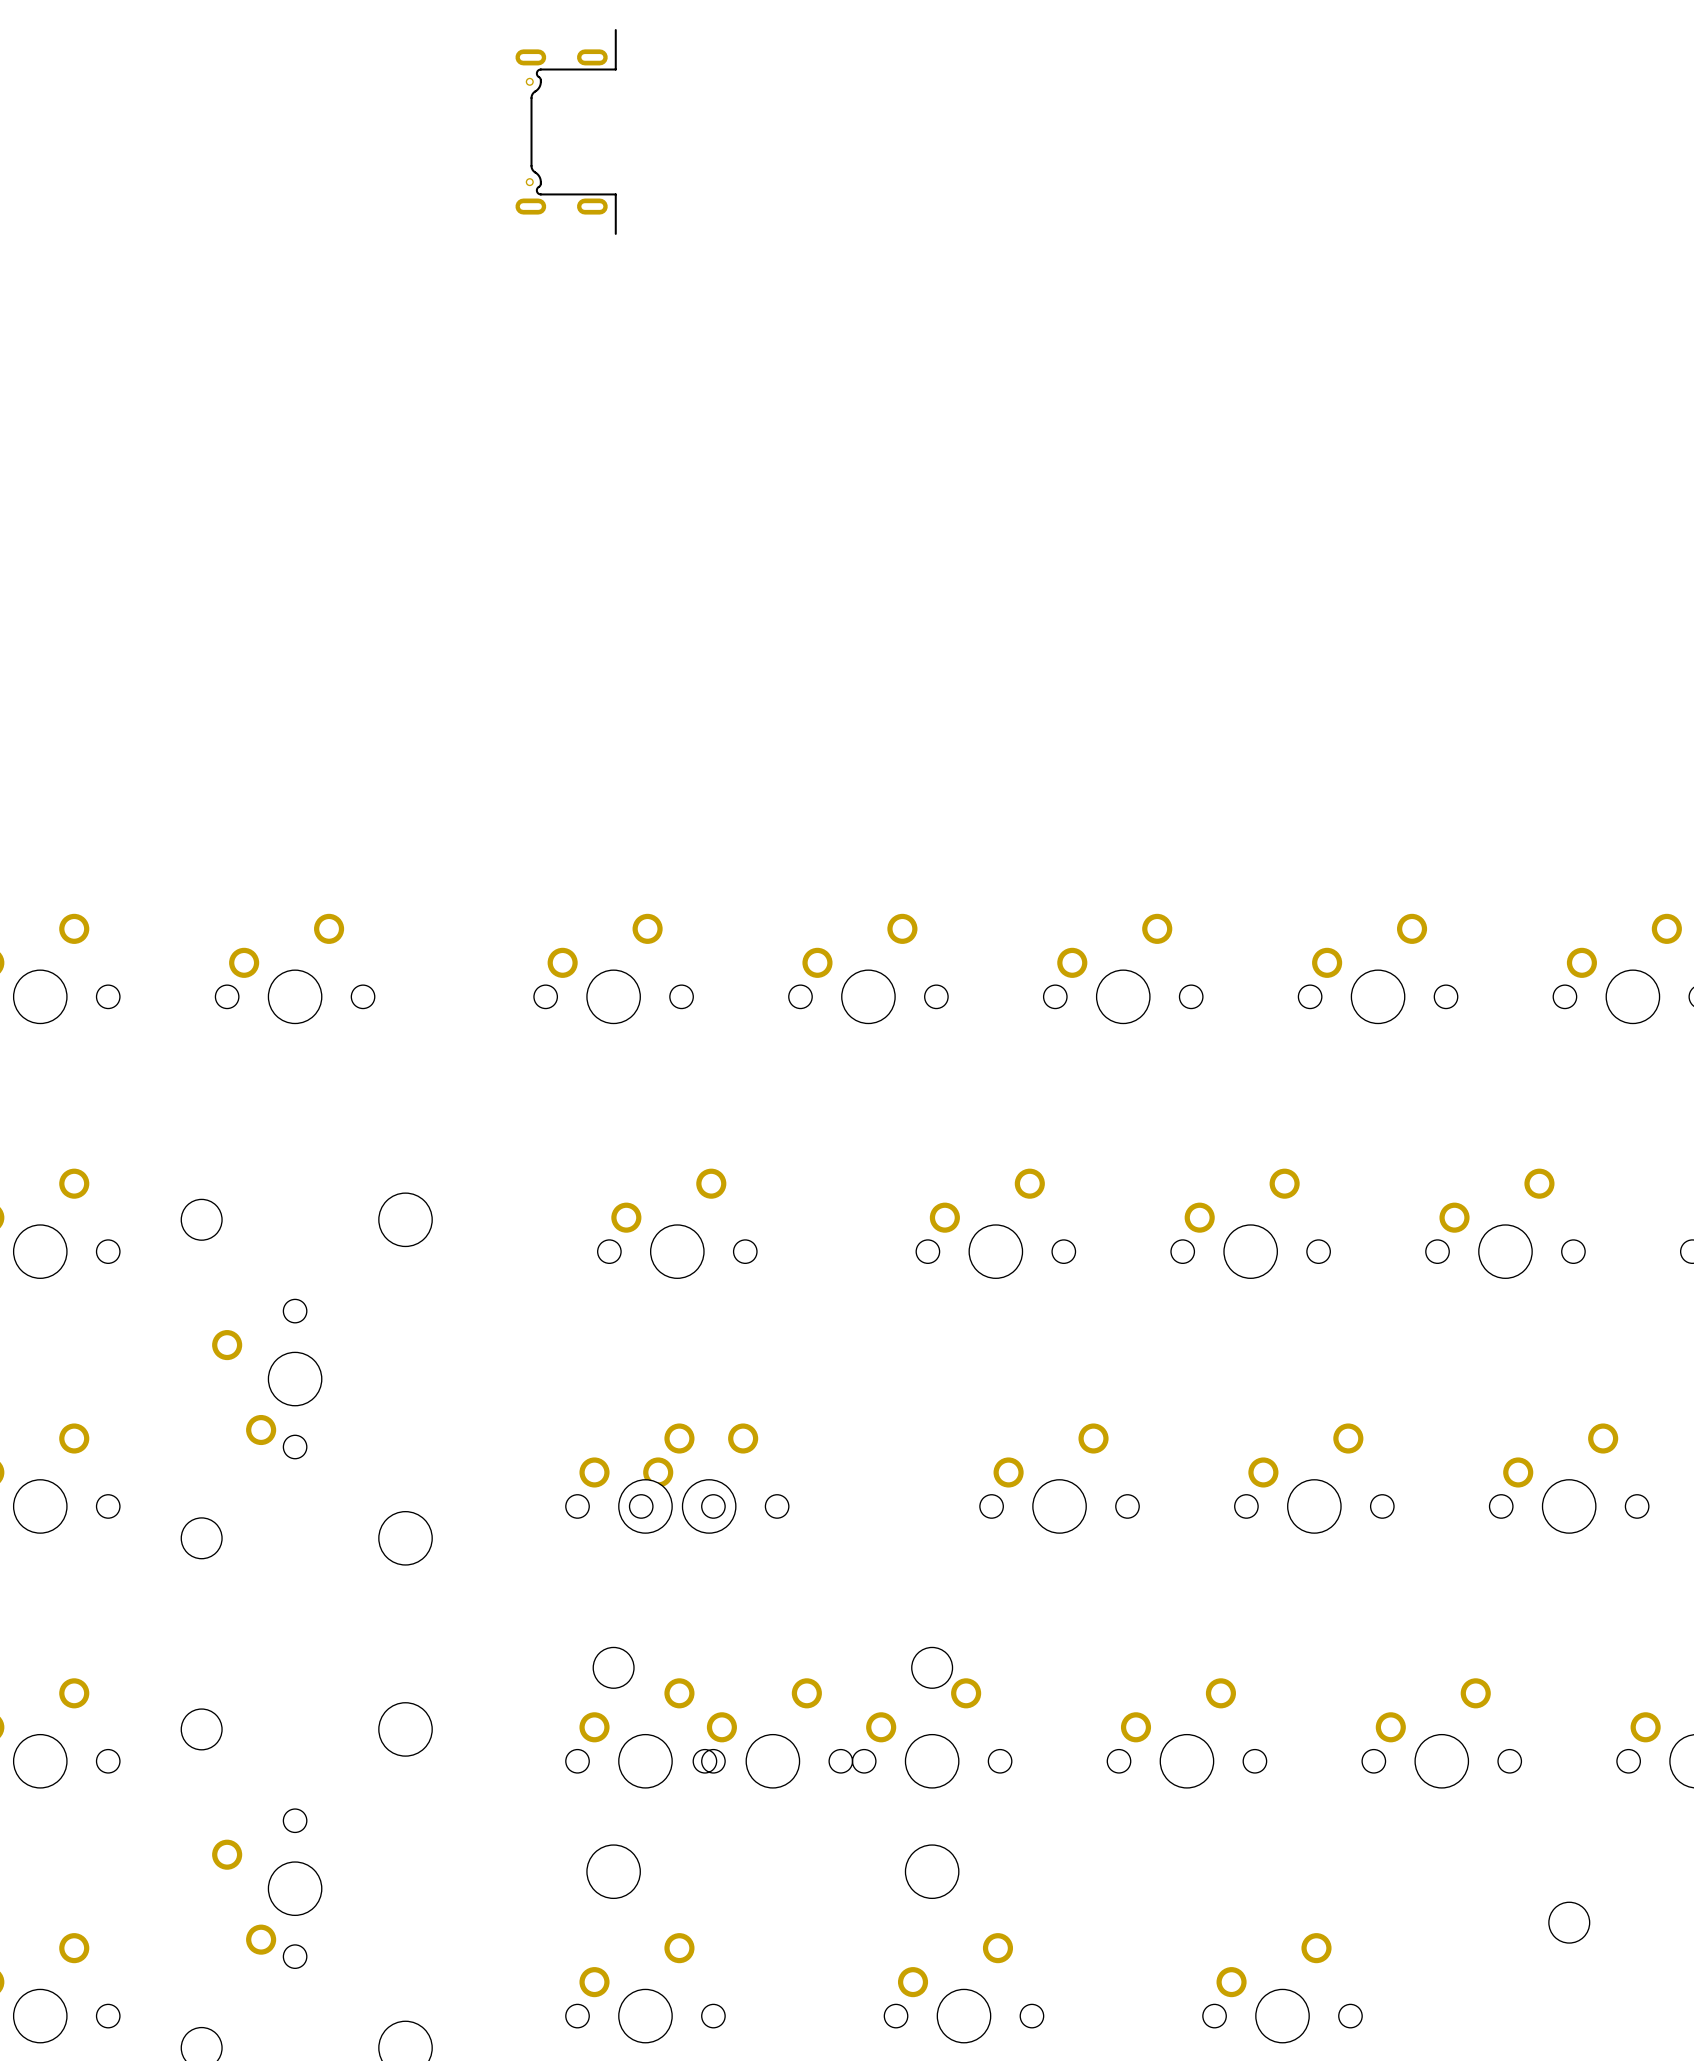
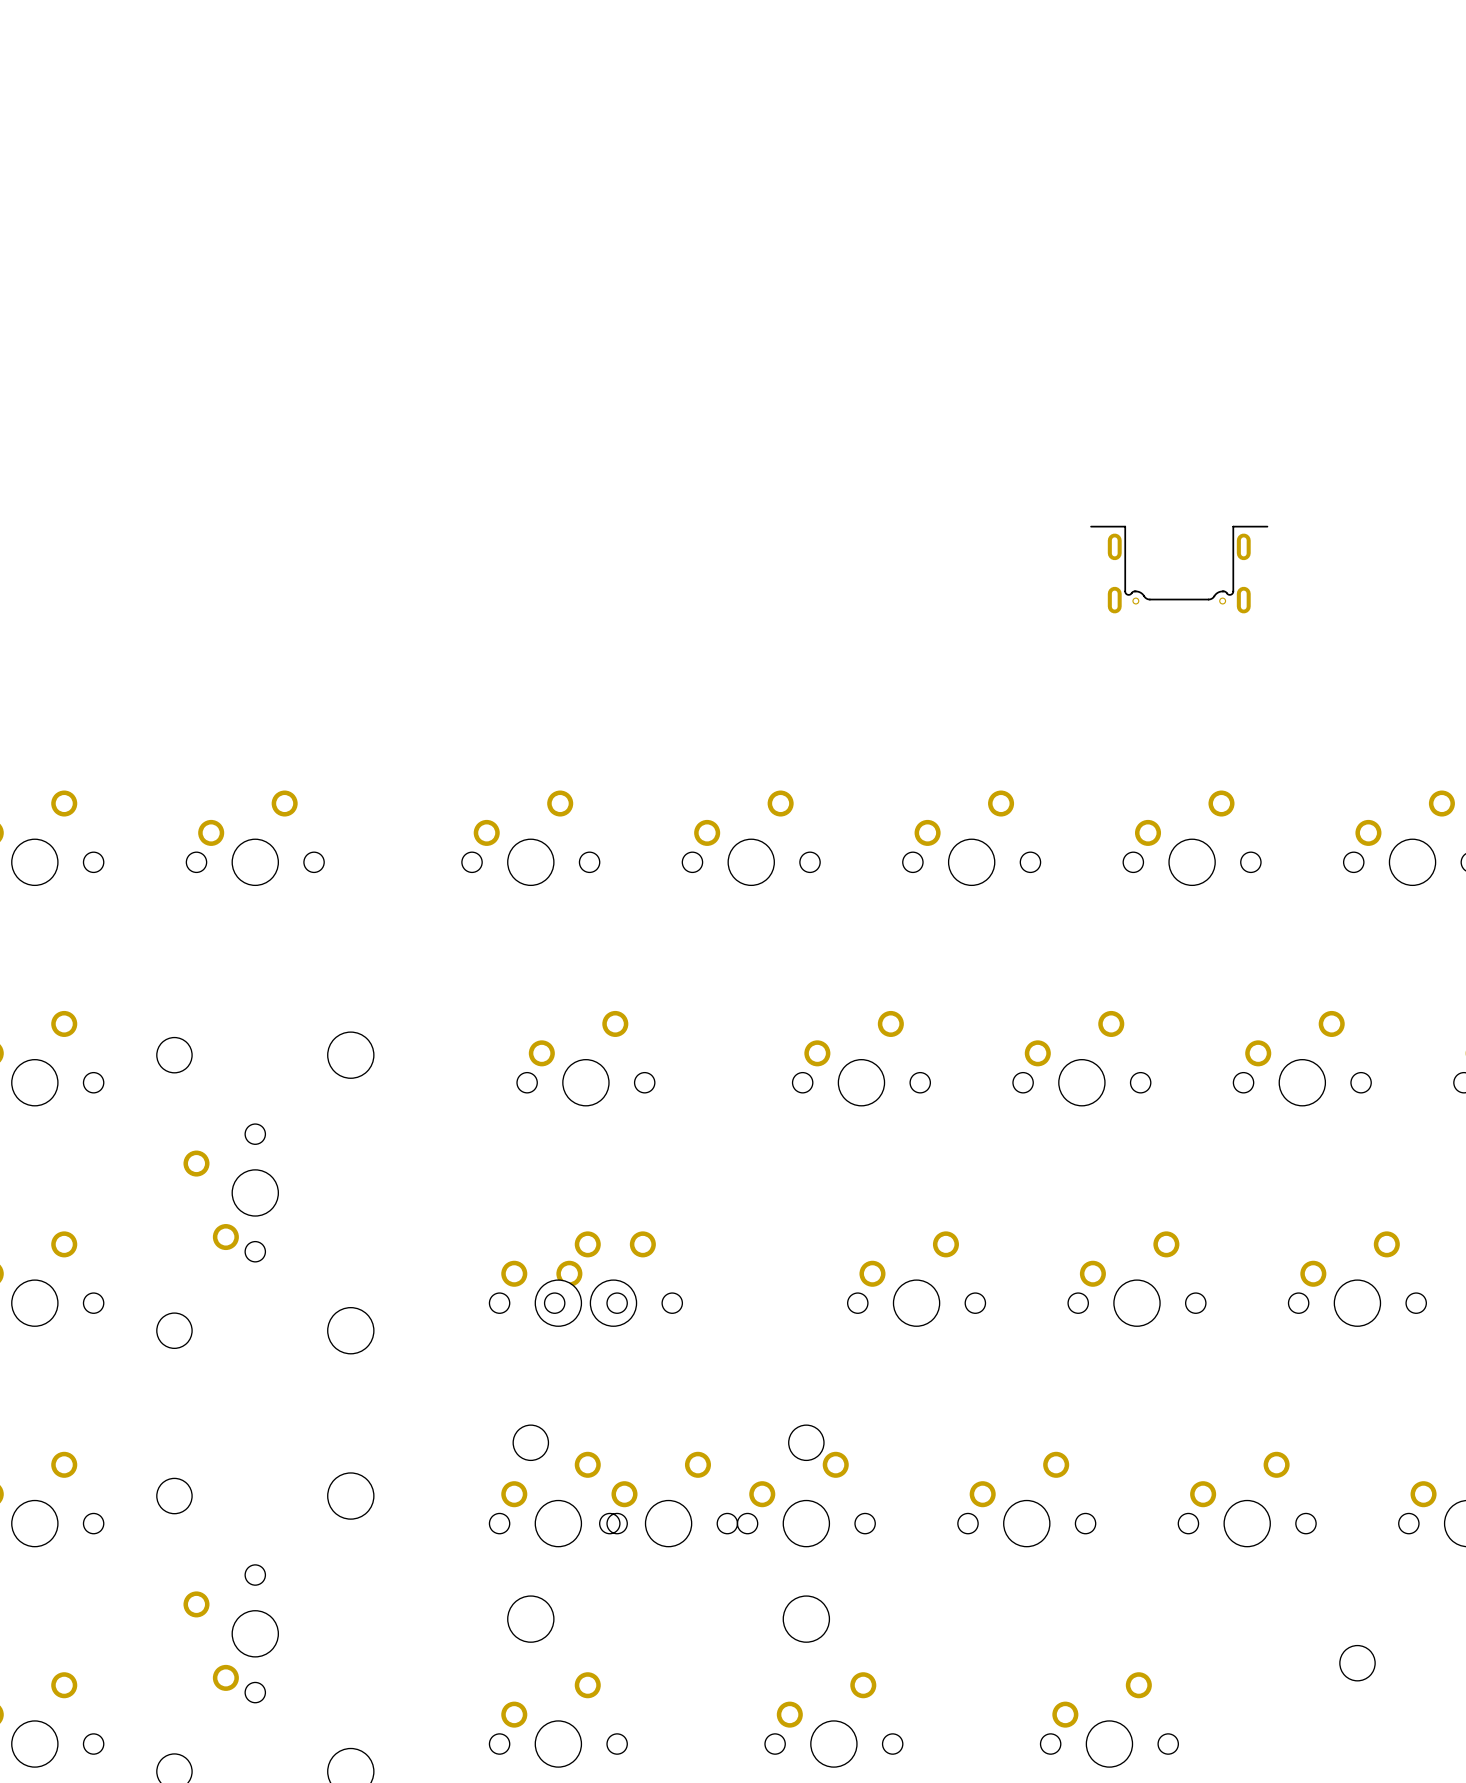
part: (566, 131) -> none
part: none -> (1179, 569)

